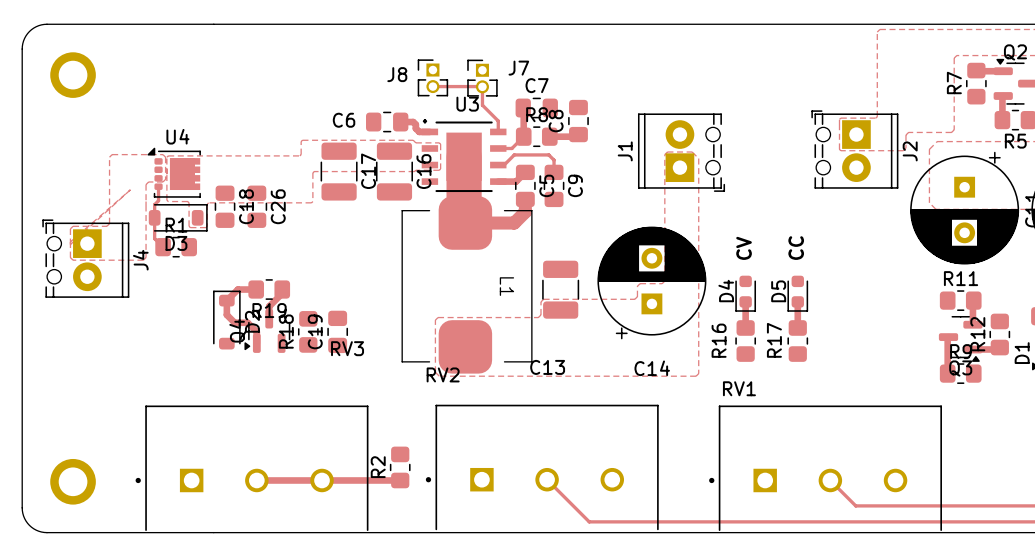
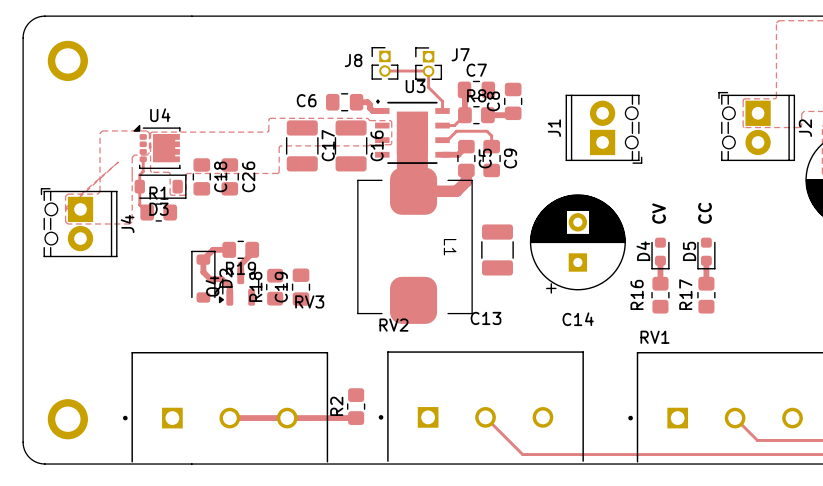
zone outline: (667, 152) (664, 154) (664, 281) (662, 283) (640, 283) (637, 286) (637, 296) (634, 299) (543, 299) (541, 301) (541, 314) (538, 317) (438, 317) (435, 320) (435, 372) (439, 376) (696, 376) (698, 373) (698, 158) (692, 152) (667, 152) -> none

